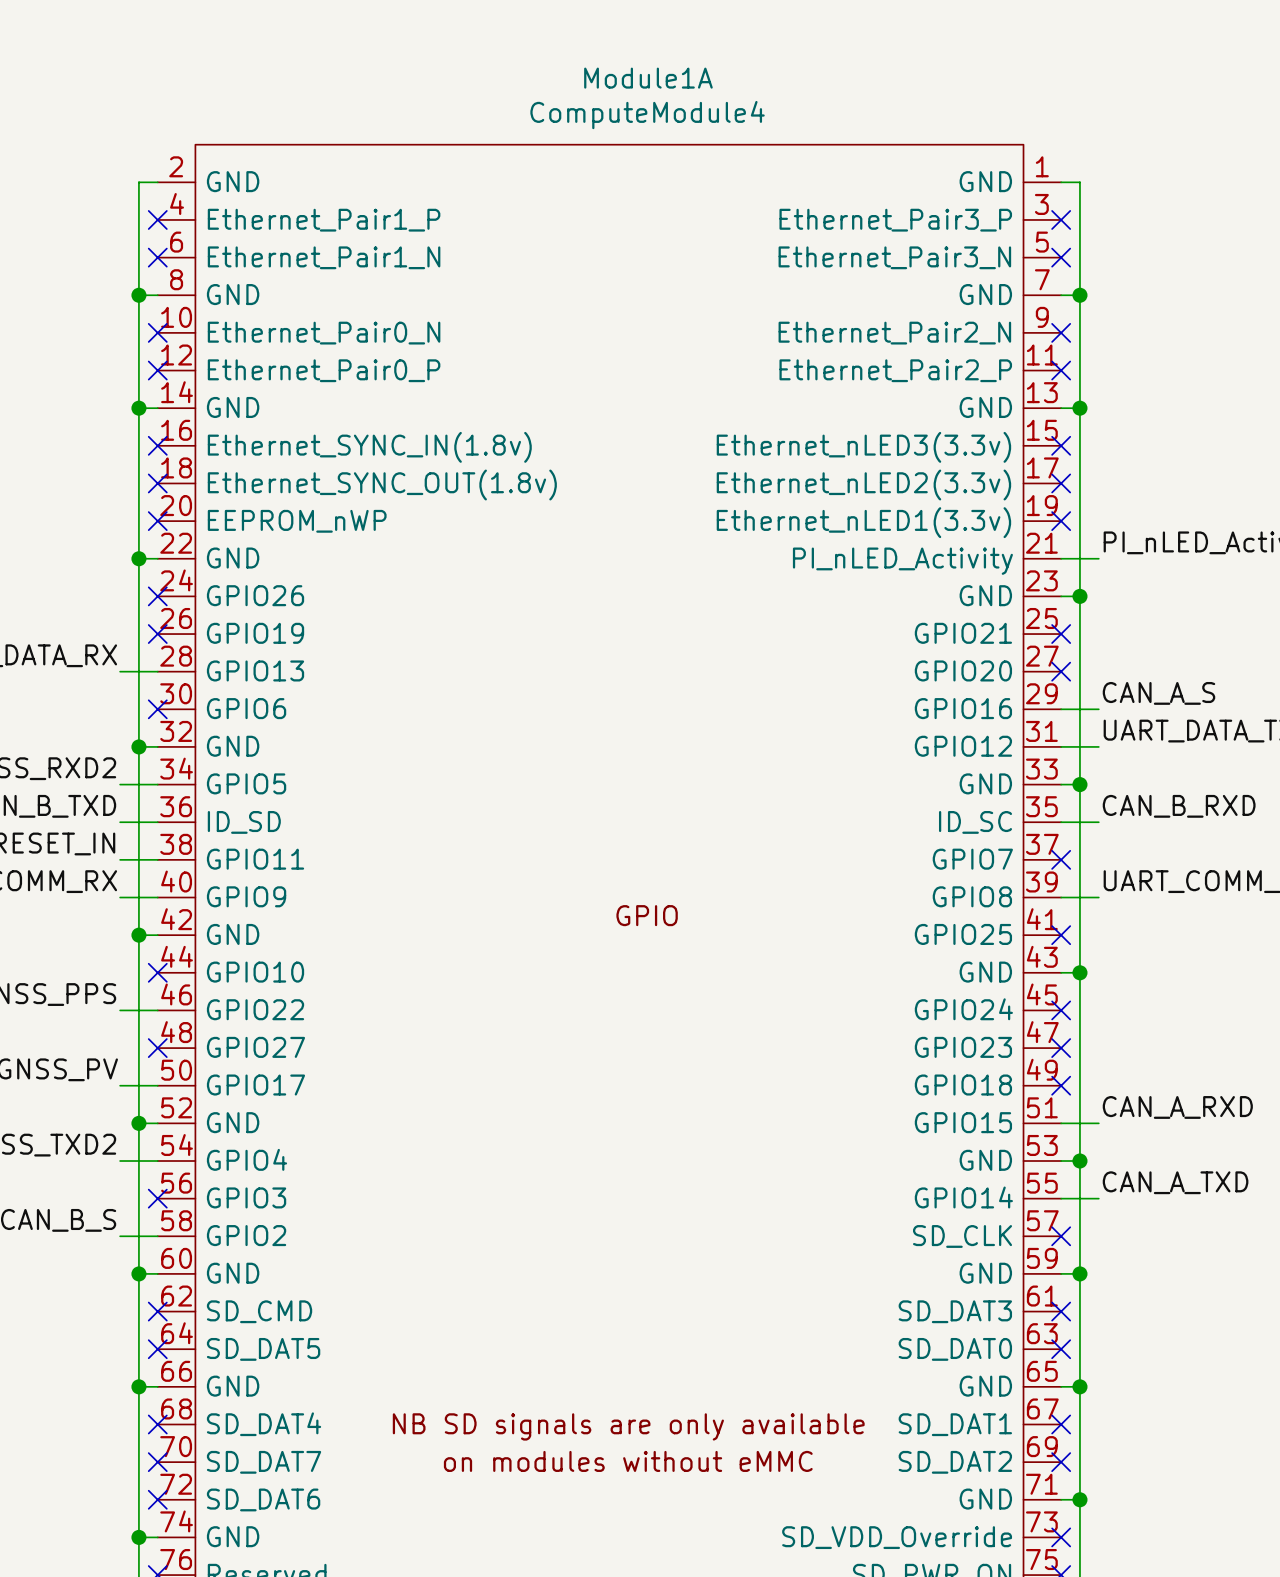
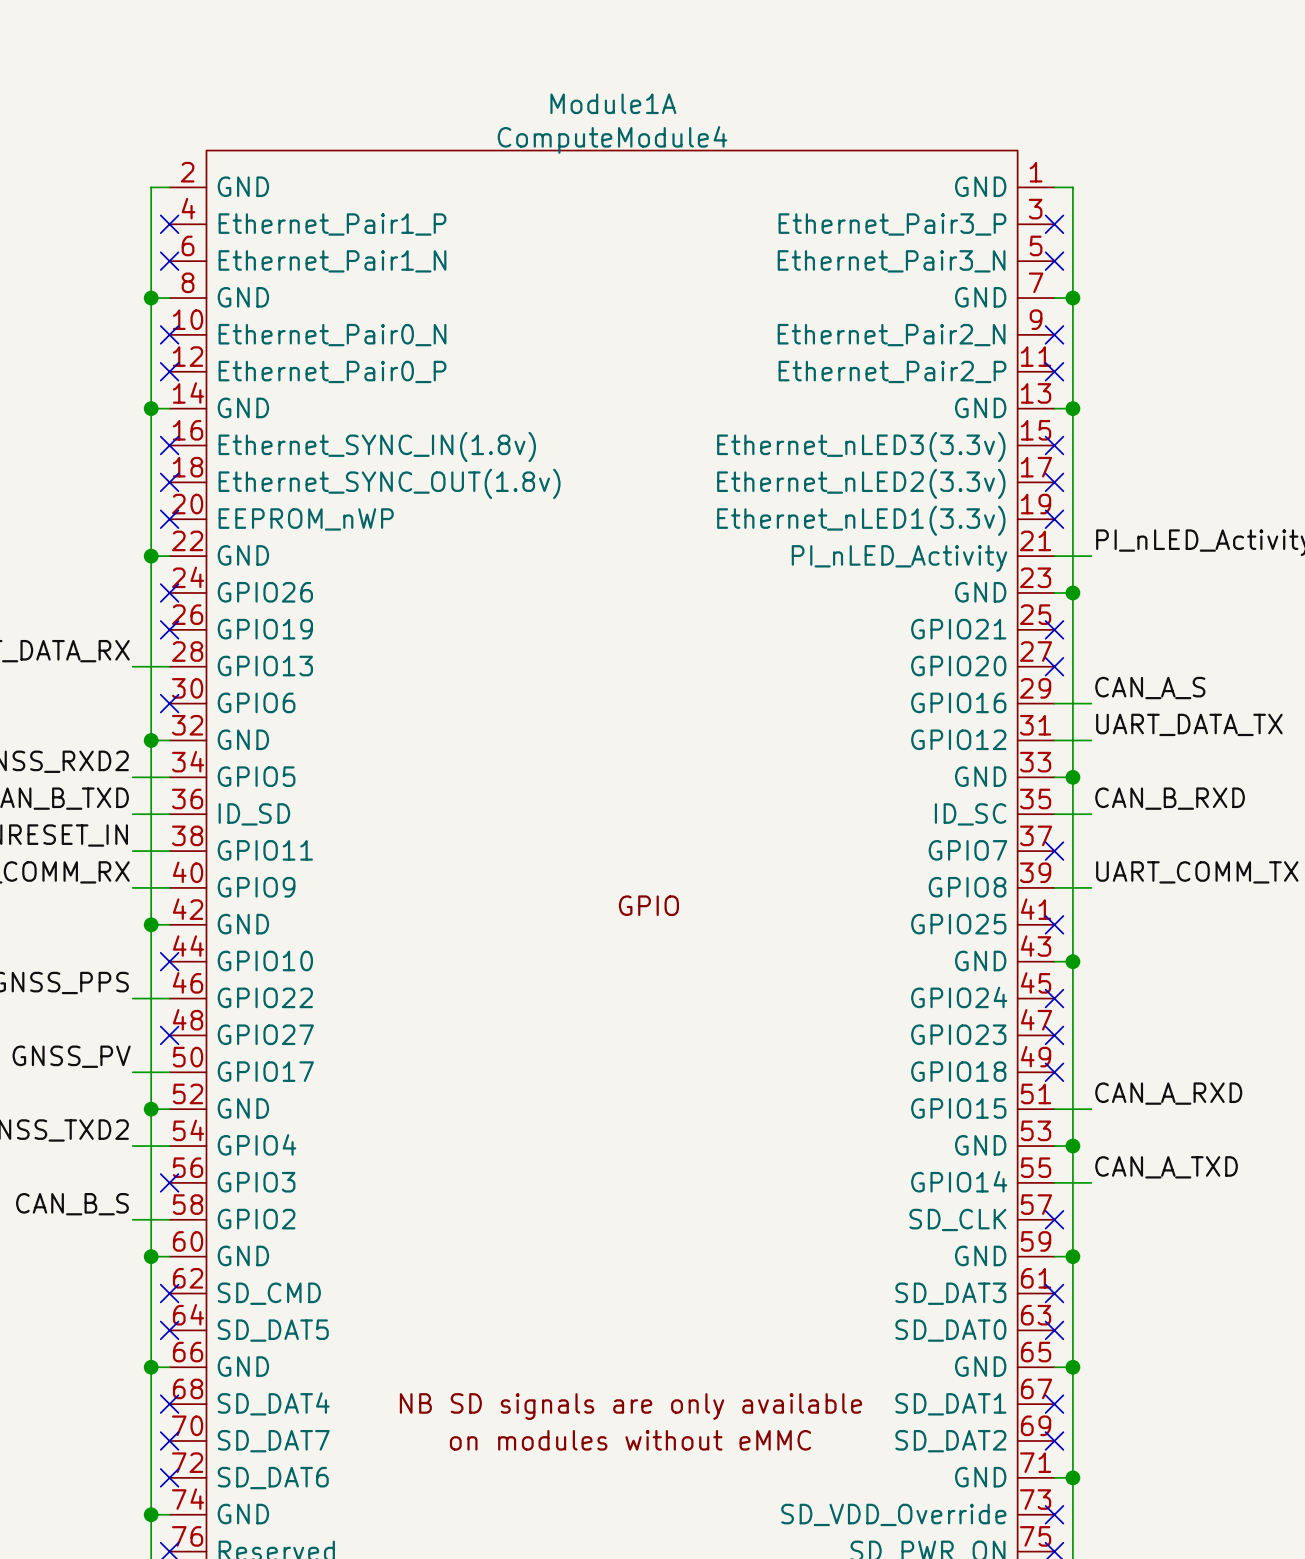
Module1A name position: Module1A (648, 78) -> Module1A (613, 103)
Module1A value position: ComputeModule4 (647, 115) -> ComputeModule4 (612, 139)

